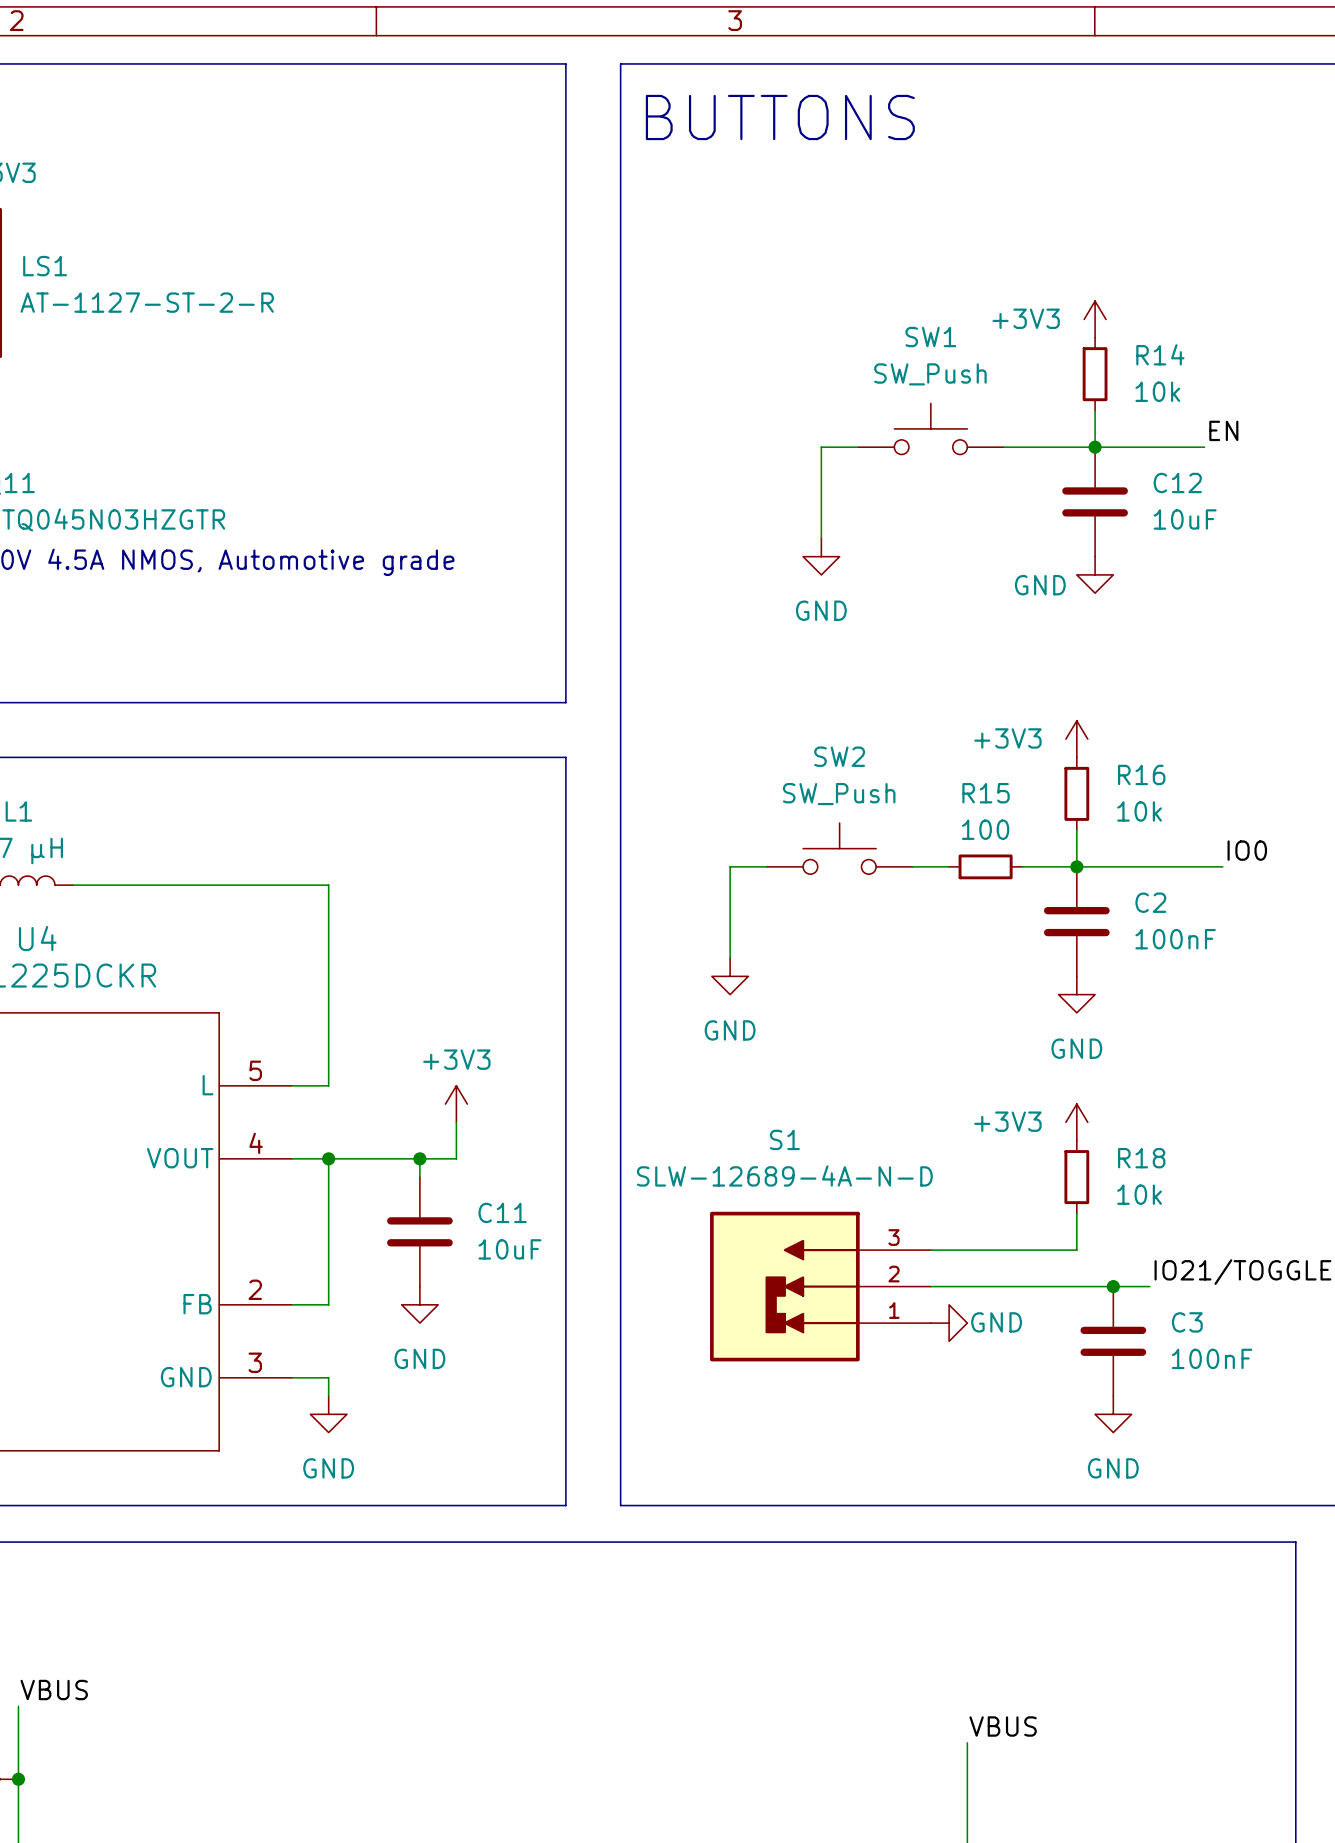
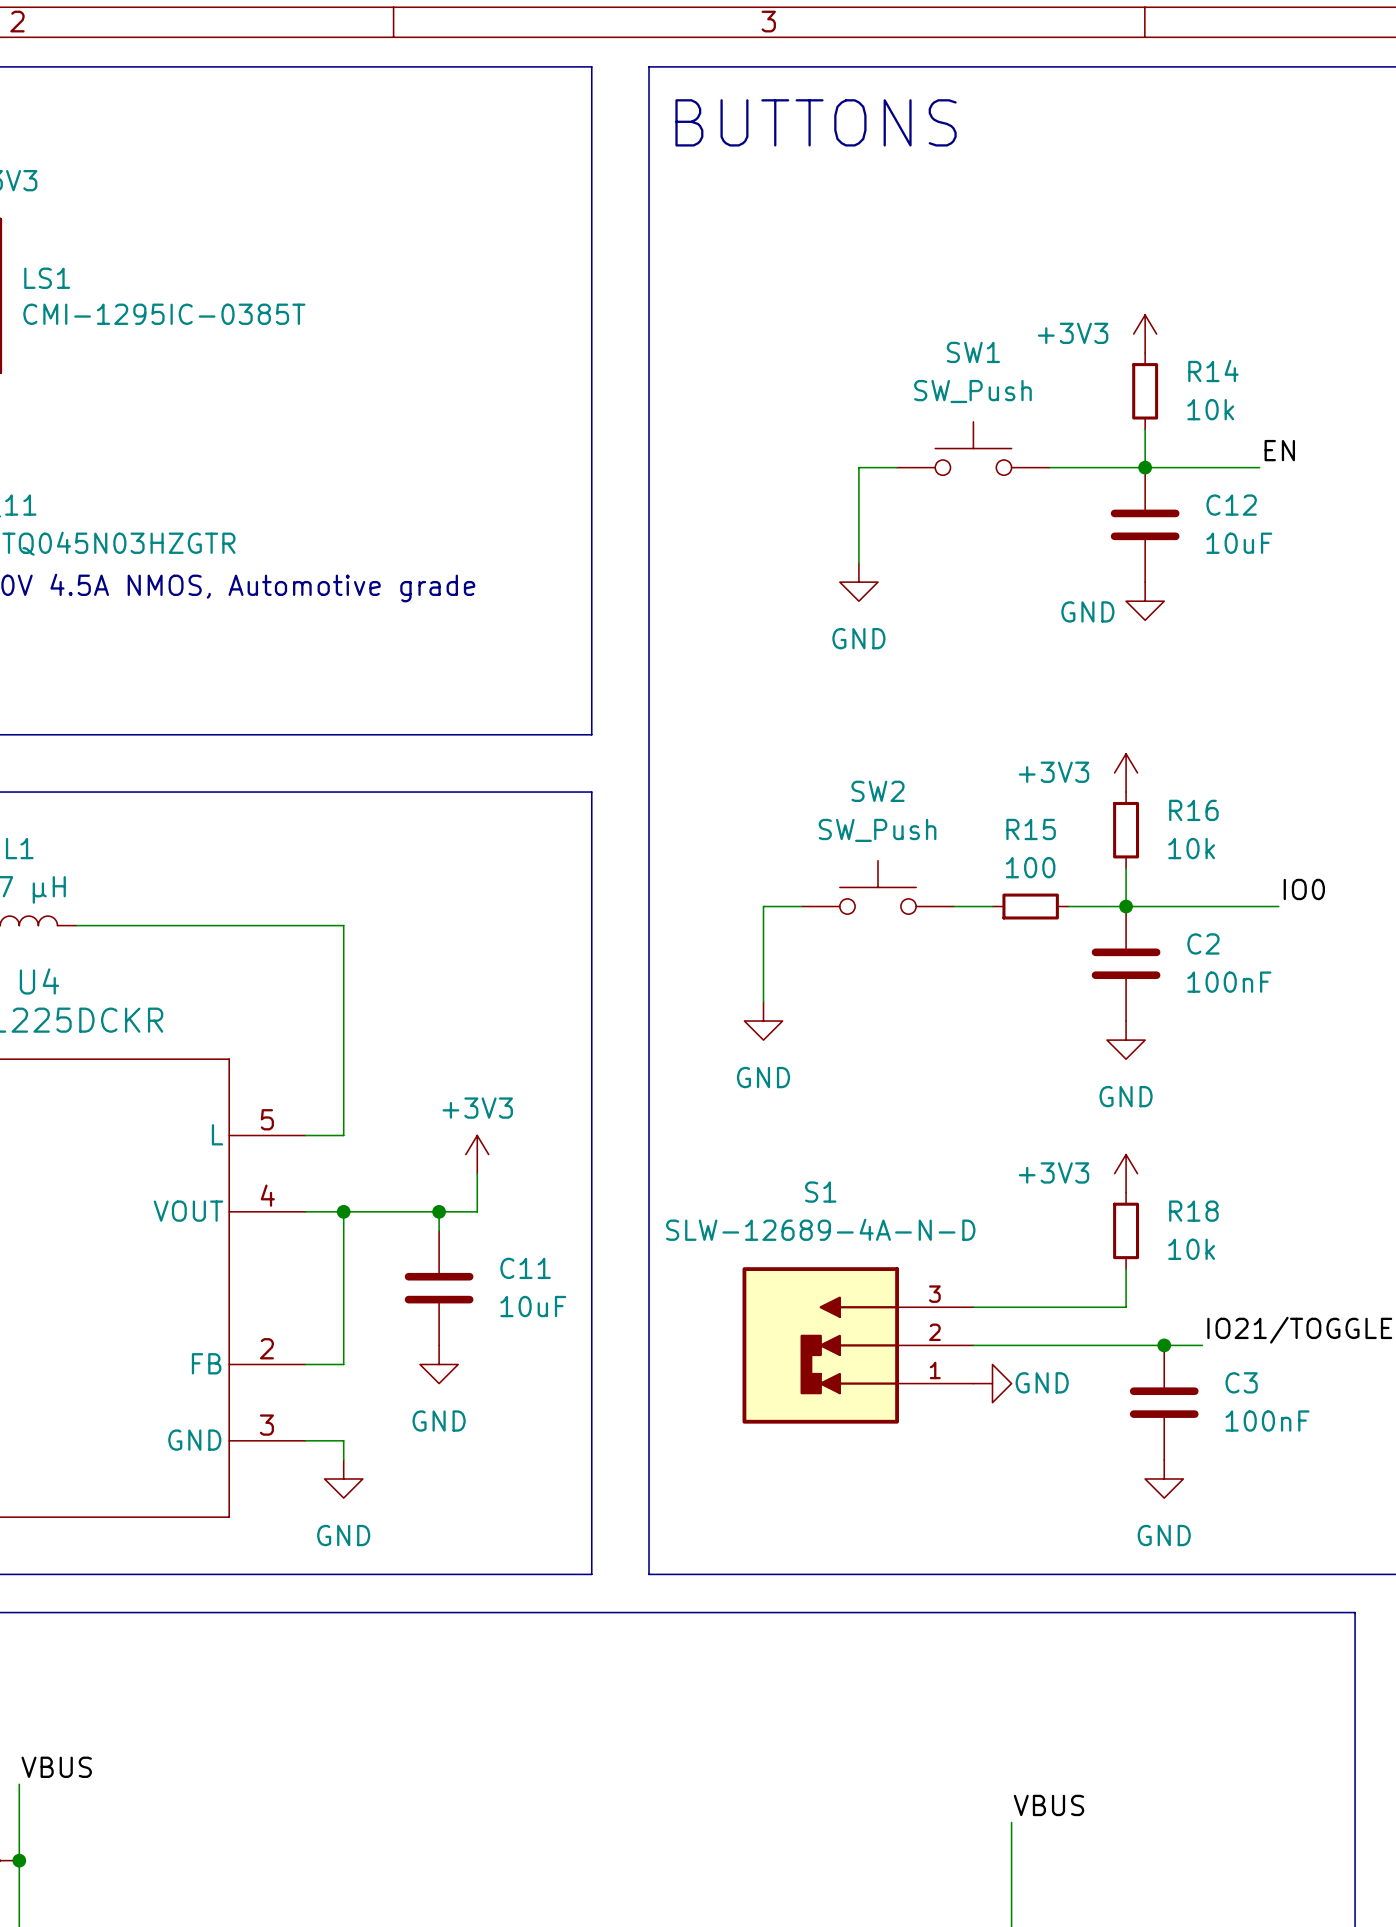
LS1 value: AT-1127-ST-2-R (147, 302) -> CMI-1295IC-0385T (164, 314)

